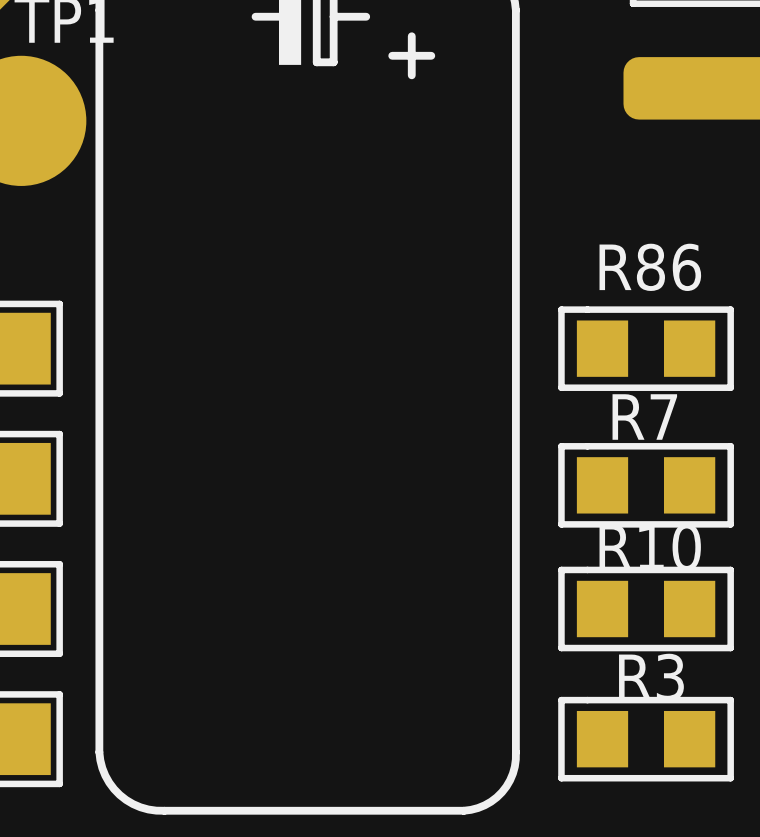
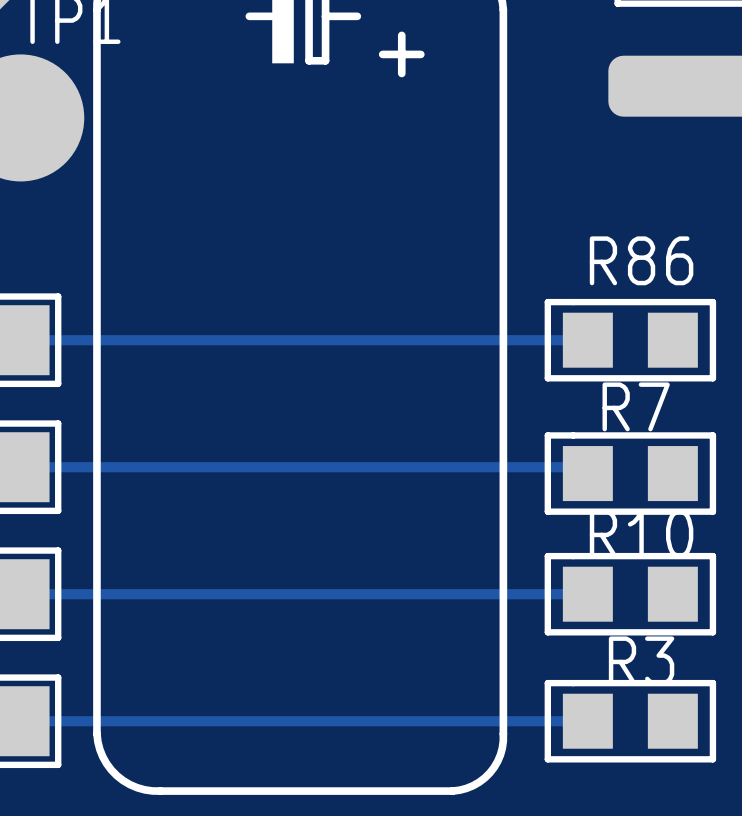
track: none -> (19, 340) (587, 340)
track: none -> (19, 467) (581, 467) (587, 473)
track: none -> (19, 594) (587, 594)
track: none -> (19, 721) (587, 721)

